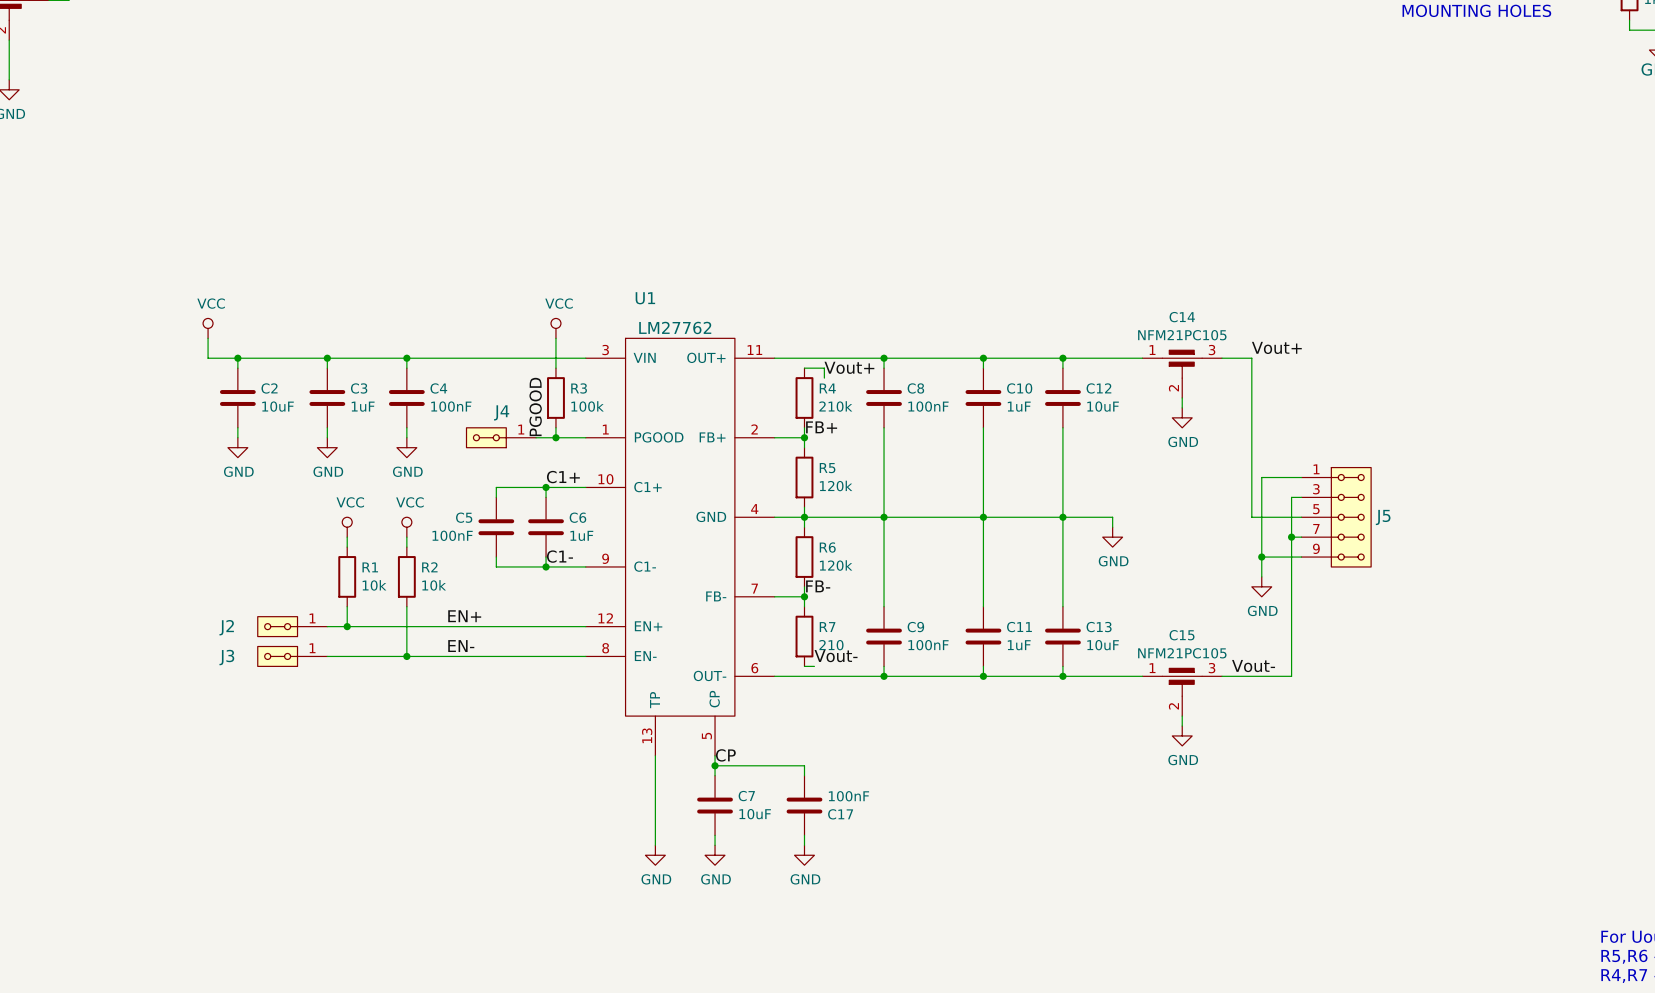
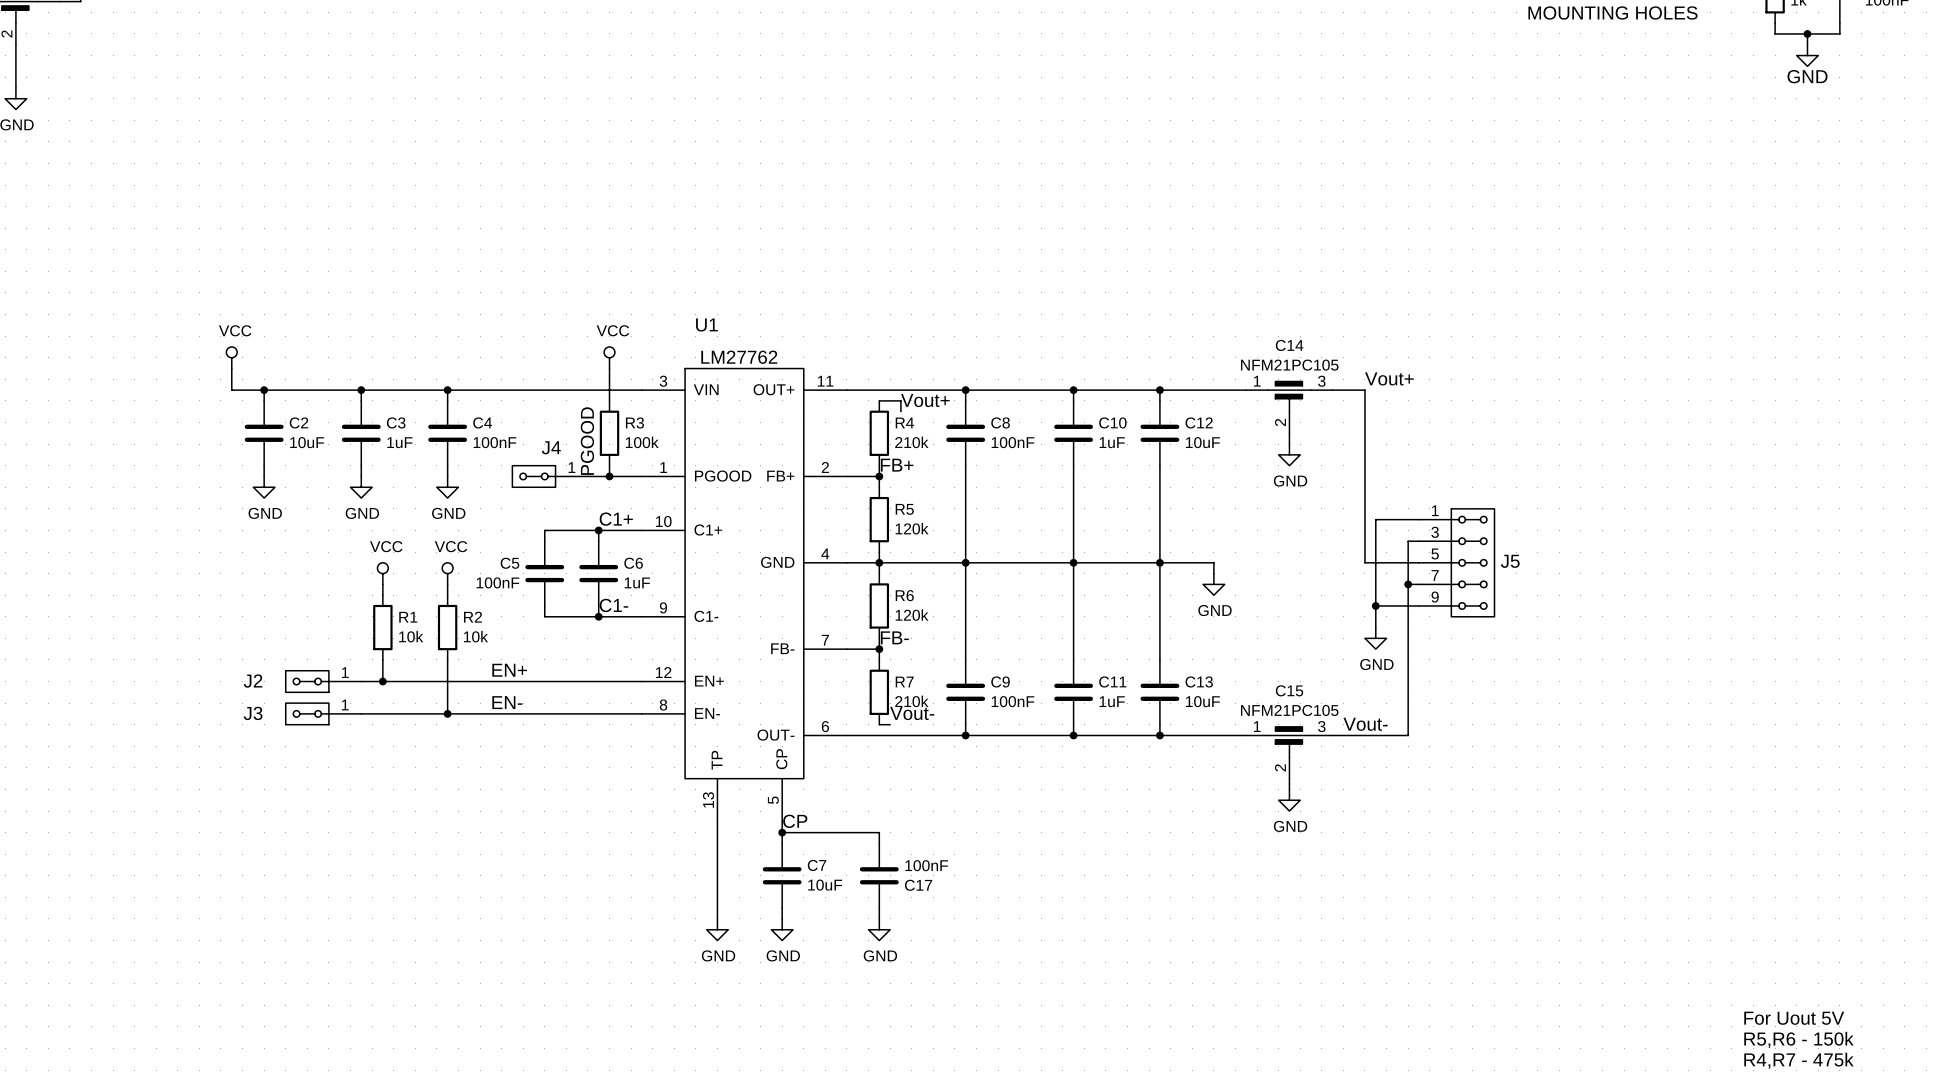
R7 value: 210 (831, 645) -> 210k (911, 701)

